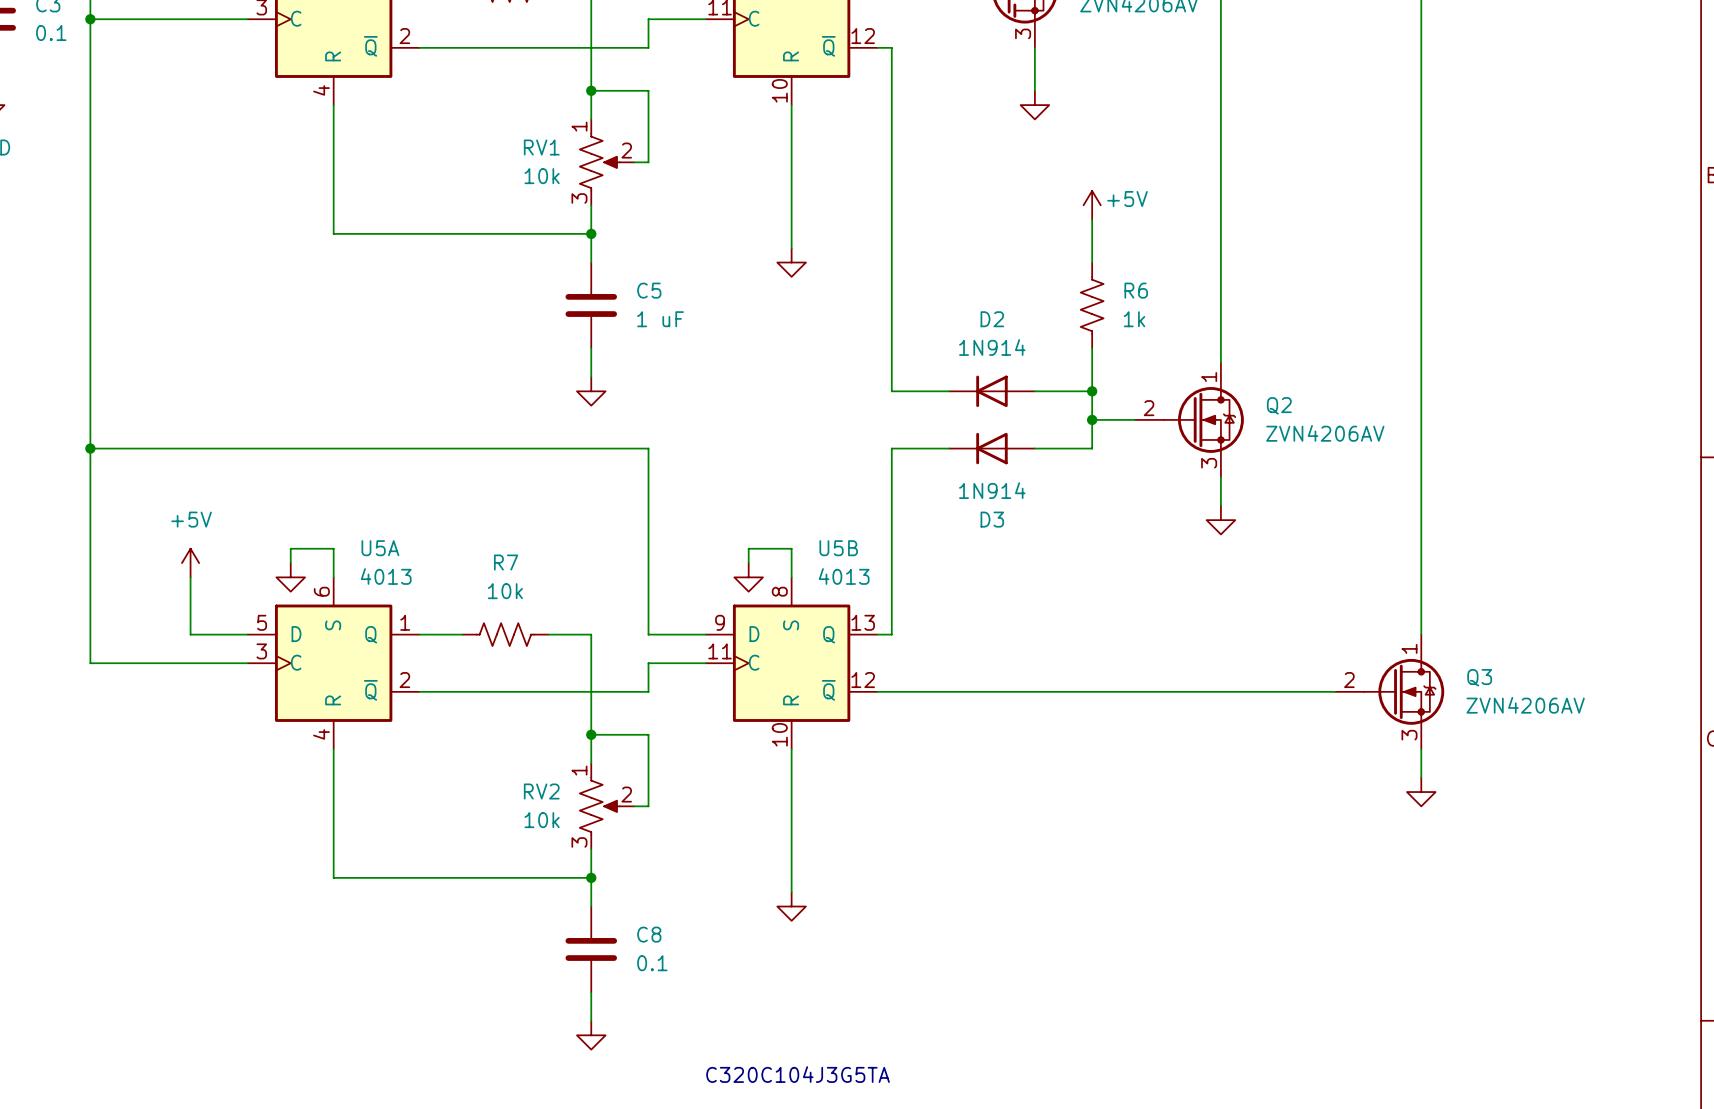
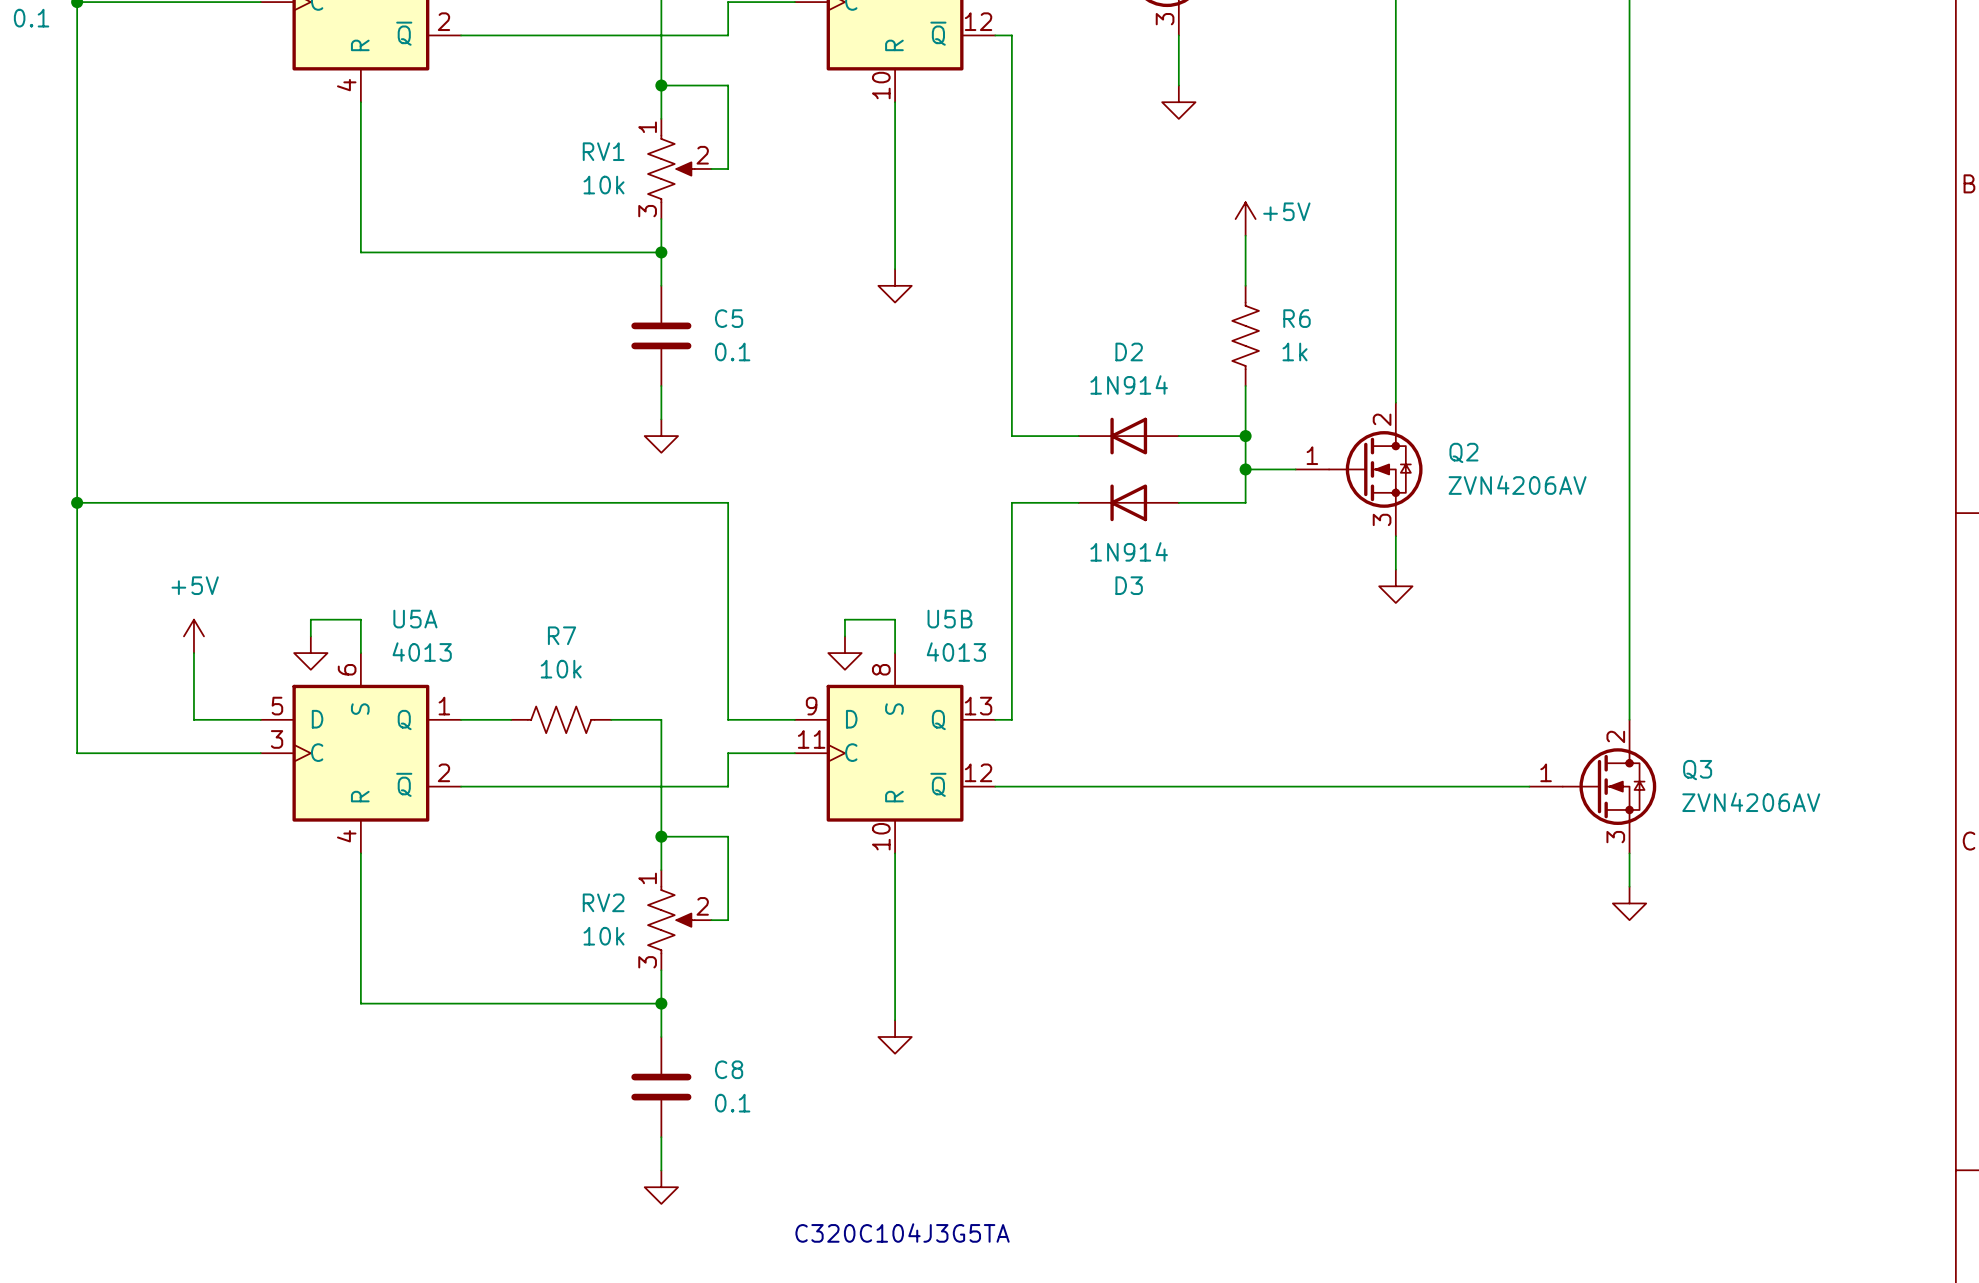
C5 value: 1 uF (660, 319) -> 0.1 (732, 351)
Q2 symbol: [1135, 362, 1244, 478] -> [1295, 402, 1423, 537]
Q3 symbol: [1335, 634, 1445, 750] -> [1529, 719, 1657, 854]

